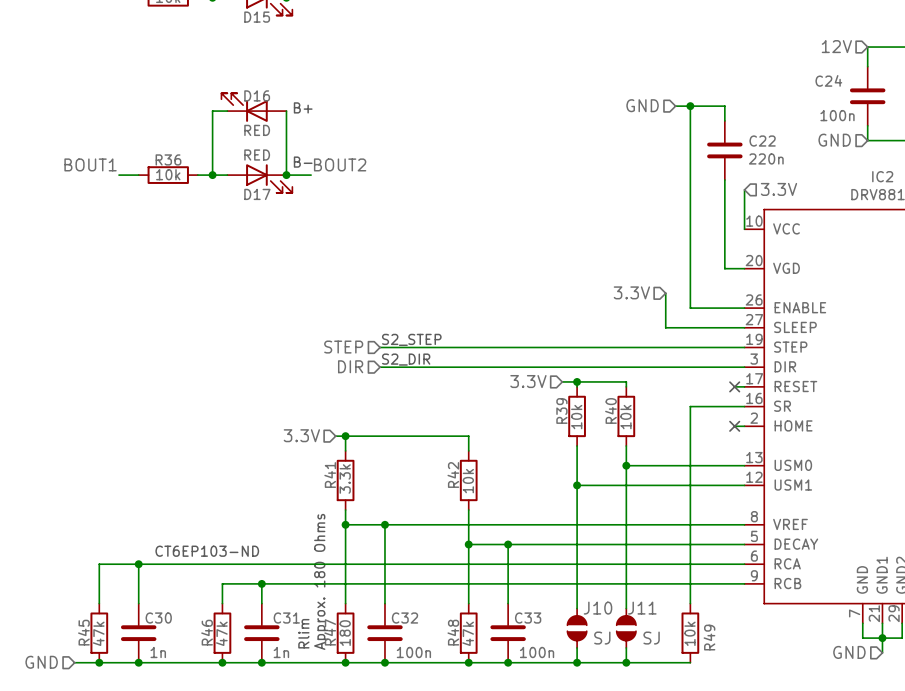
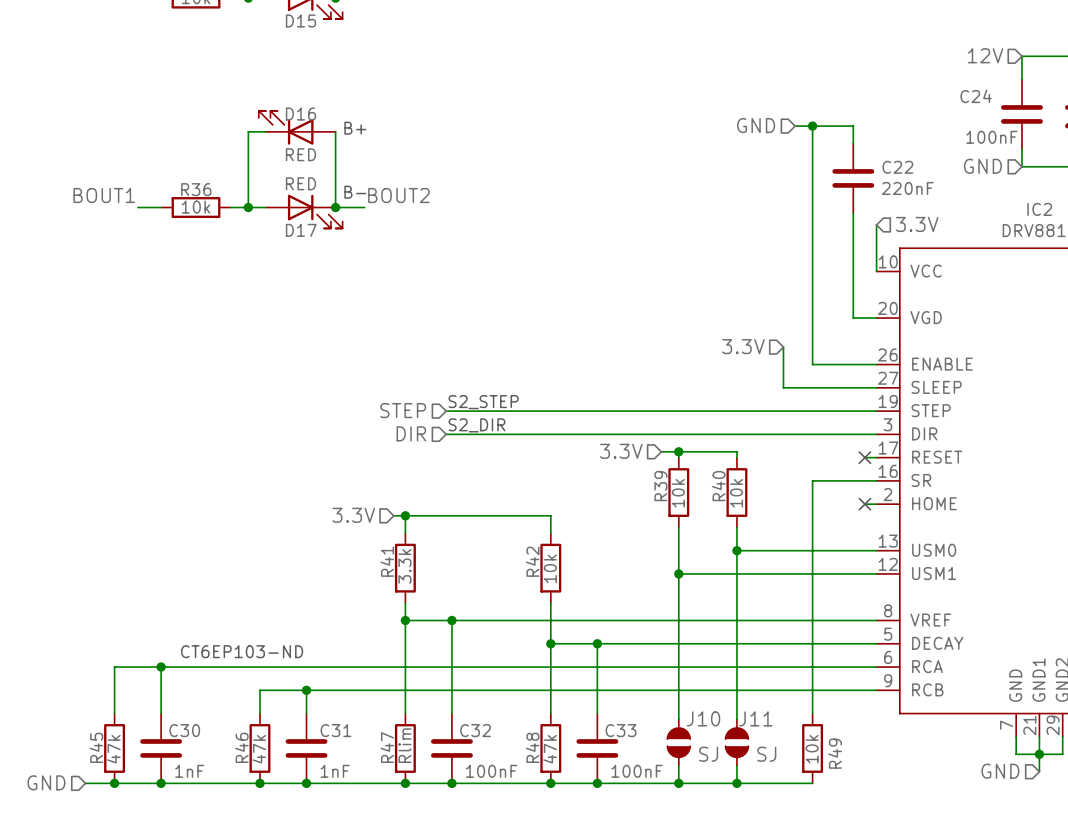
C24 value: 100n (837, 115) -> 100nF (991, 137)
C22 value: 220n (766, 158) -> 220nF (907, 188)
text: Approx. 180 Ohms (321, 581) -> none
text: Rlim (303, 633) -> none
R47 value: 180 (345, 633) -> Rlim (404, 745)
C30 value: 1n (158, 652) -> 1nF (189, 771)
C31 value: 1n (281, 652) -> 1nF (335, 771)
C32 value: 100n (413, 652) -> 100nF (491, 771)
C33 value: 100n (537, 652) -> 100nF (637, 771)

